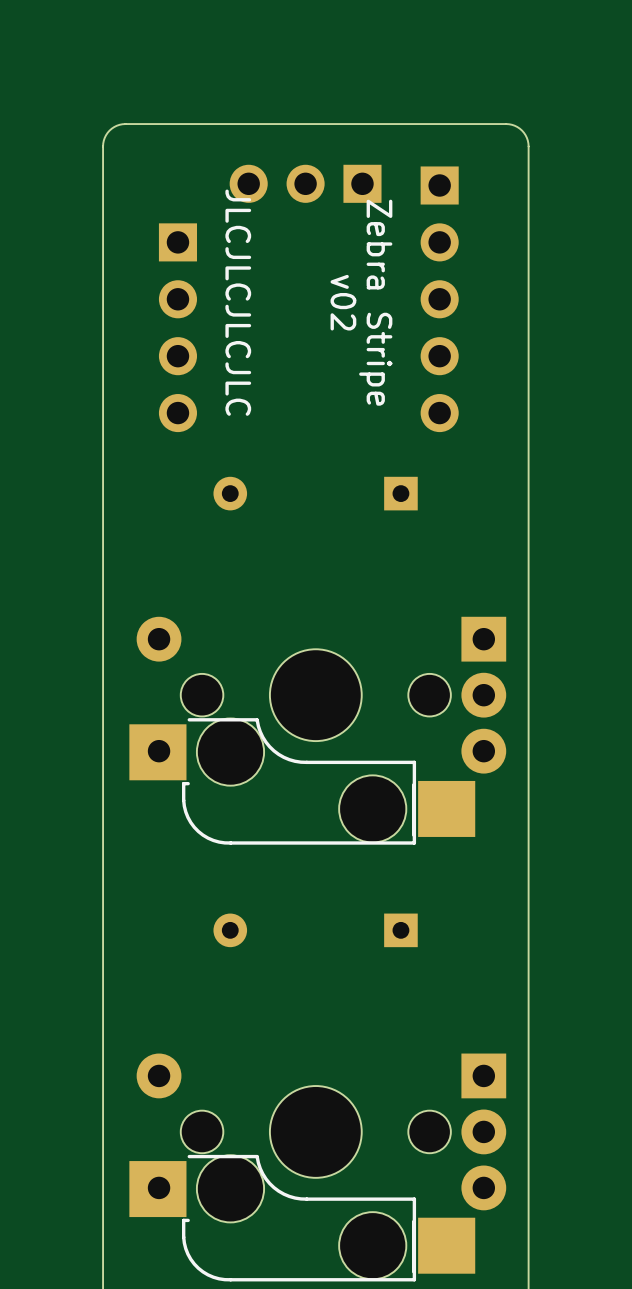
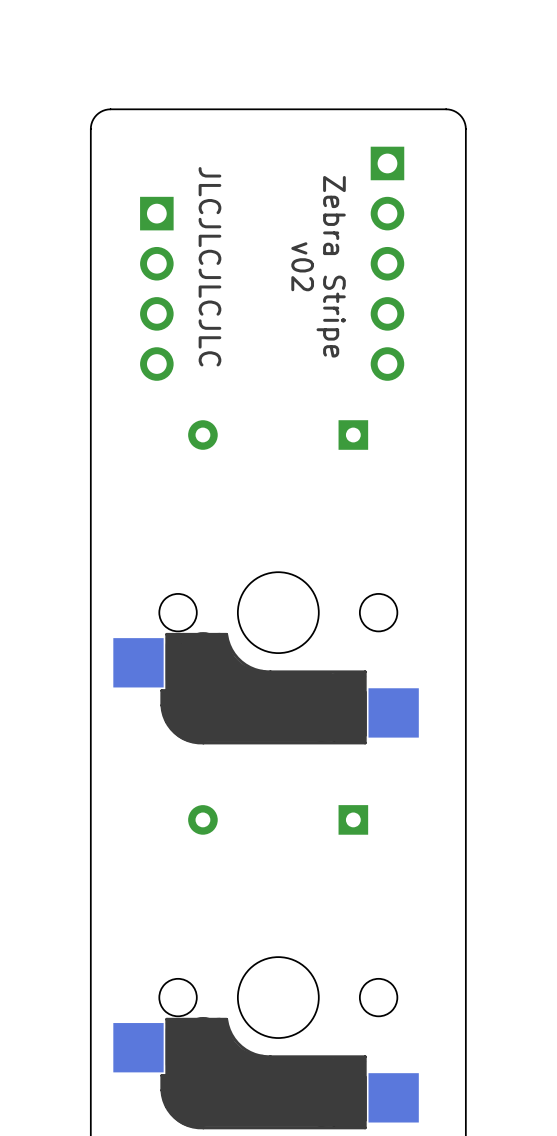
part: (305, 183) -> none
part: (317, 730) -> none
part: none -> (266, 658)
part: (317, 1167) -> none
part: none -> (266, 1043)

